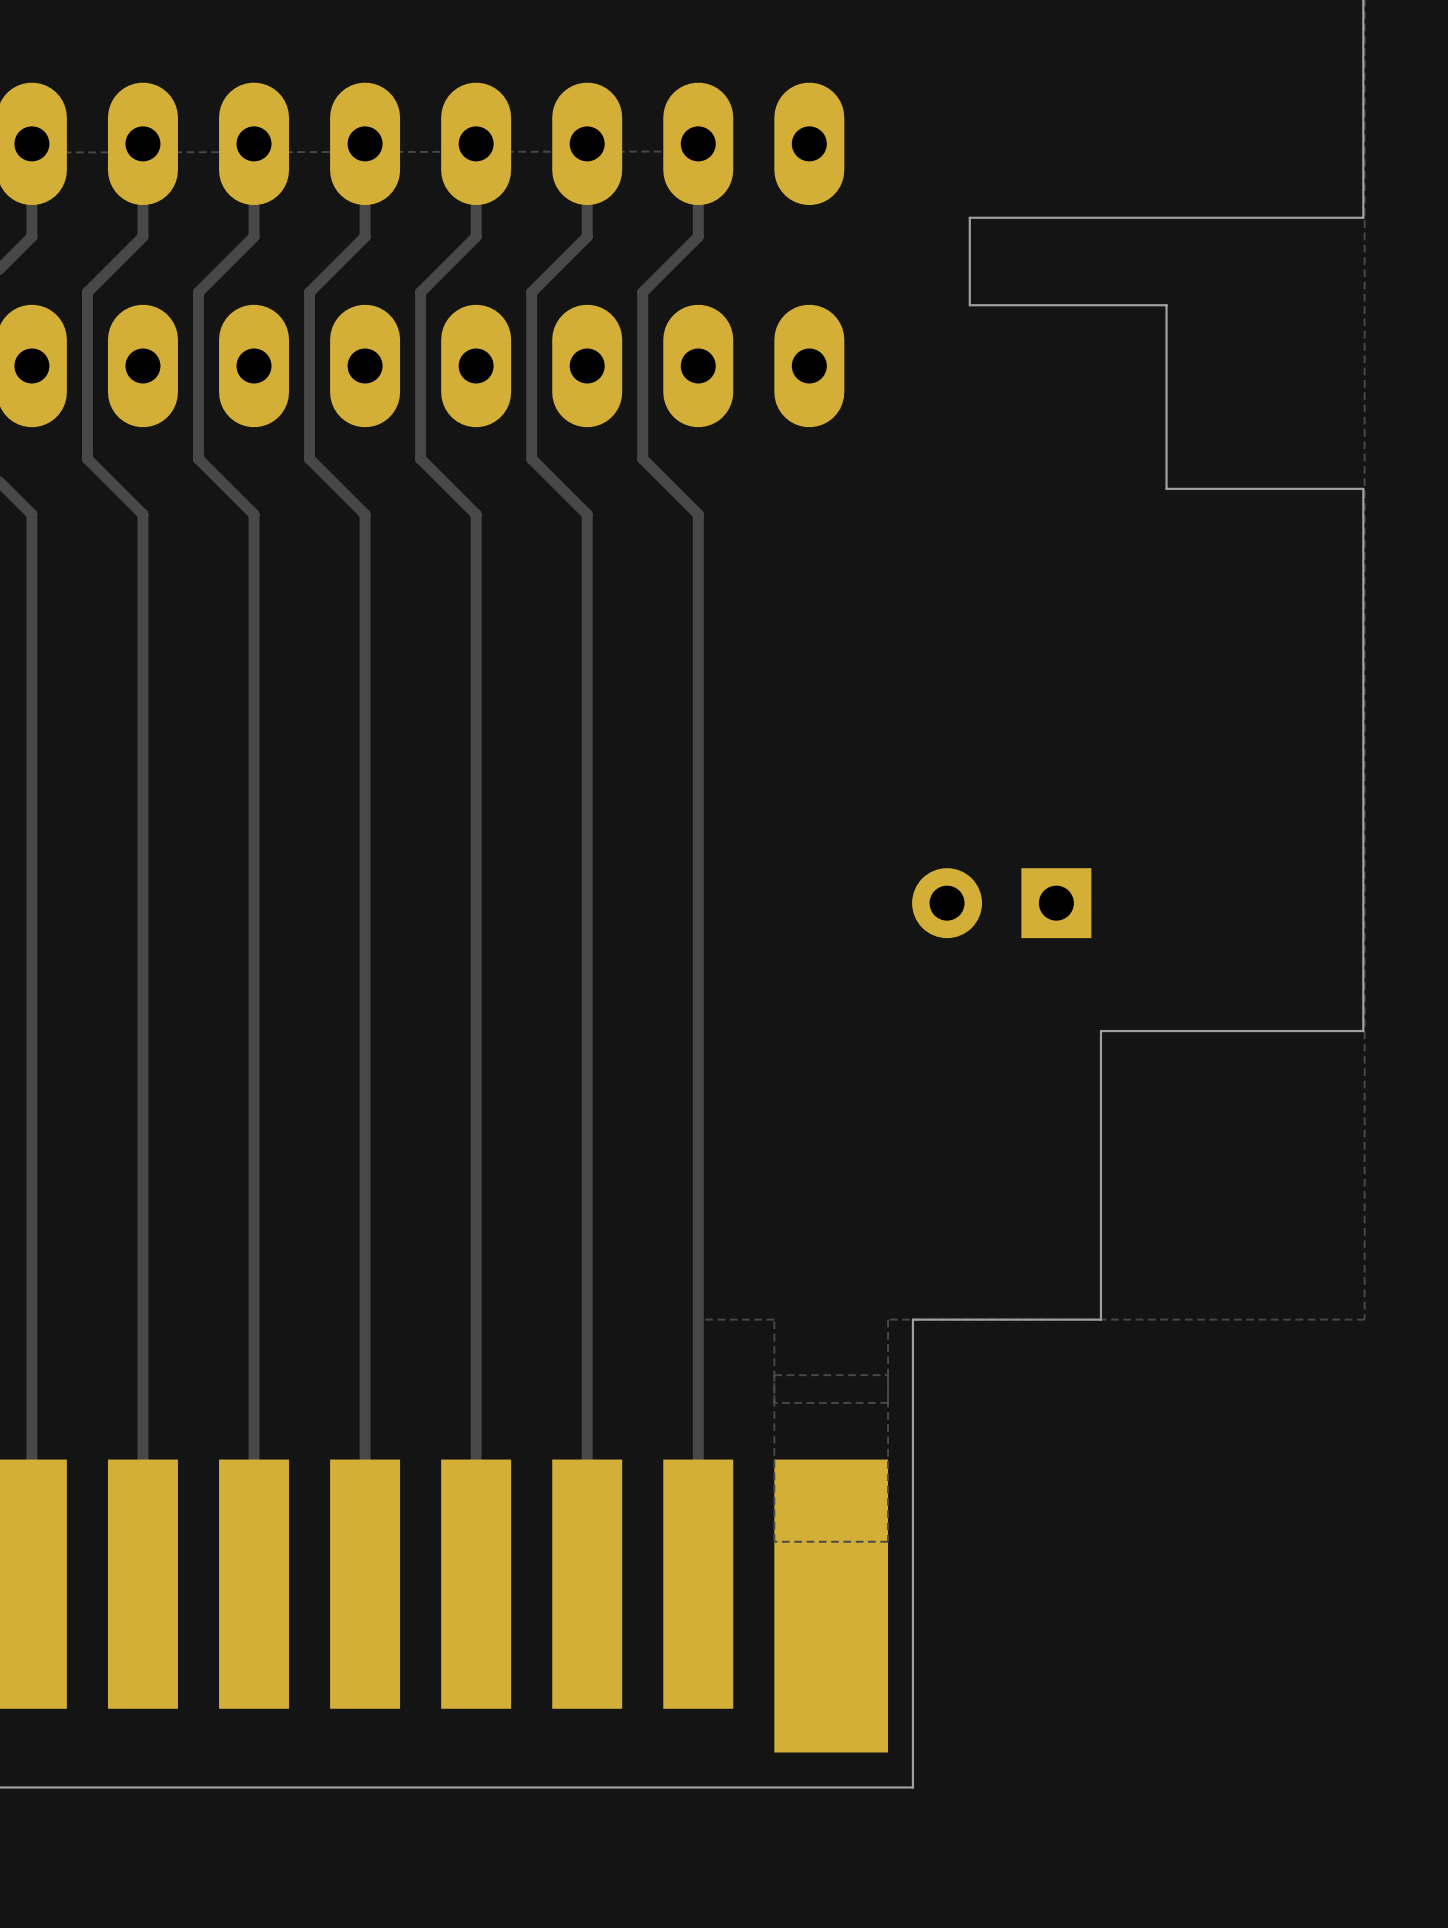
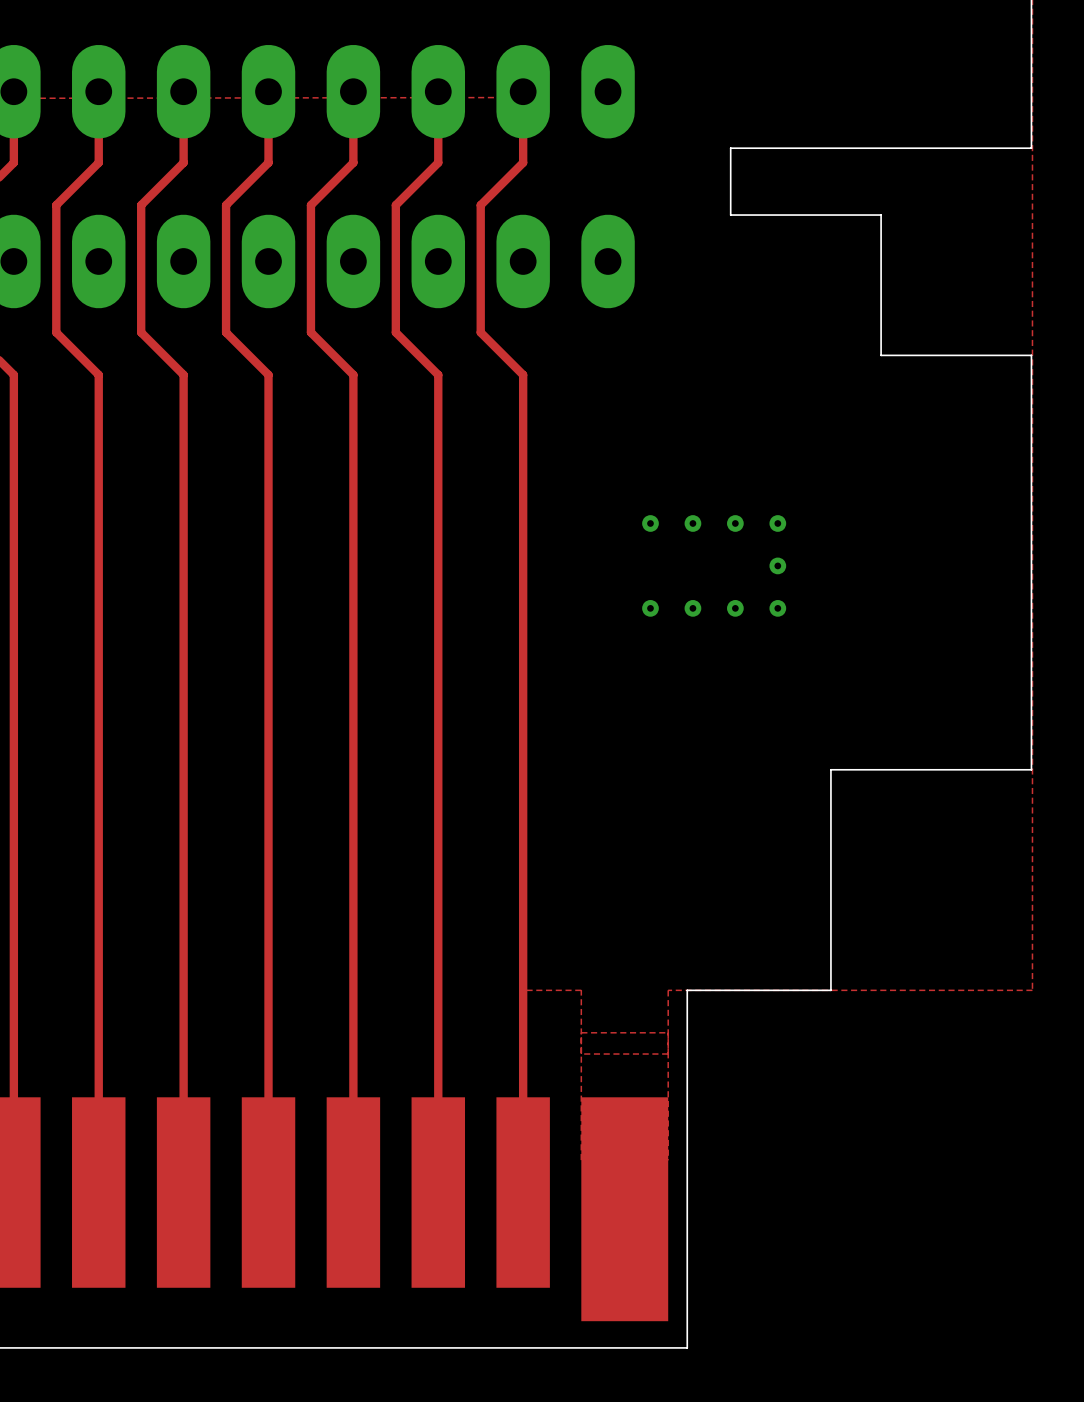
via: none -> (650, 523)
via: none -> (692, 523)
via: none -> (735, 523)
via: none -> (777, 523)
via: none -> (777, 565)
via: none -> (650, 608)
via: none -> (692, 608)
via: none -> (735, 608)
via: none -> (777, 608)
part: (1001, 903) -> none

